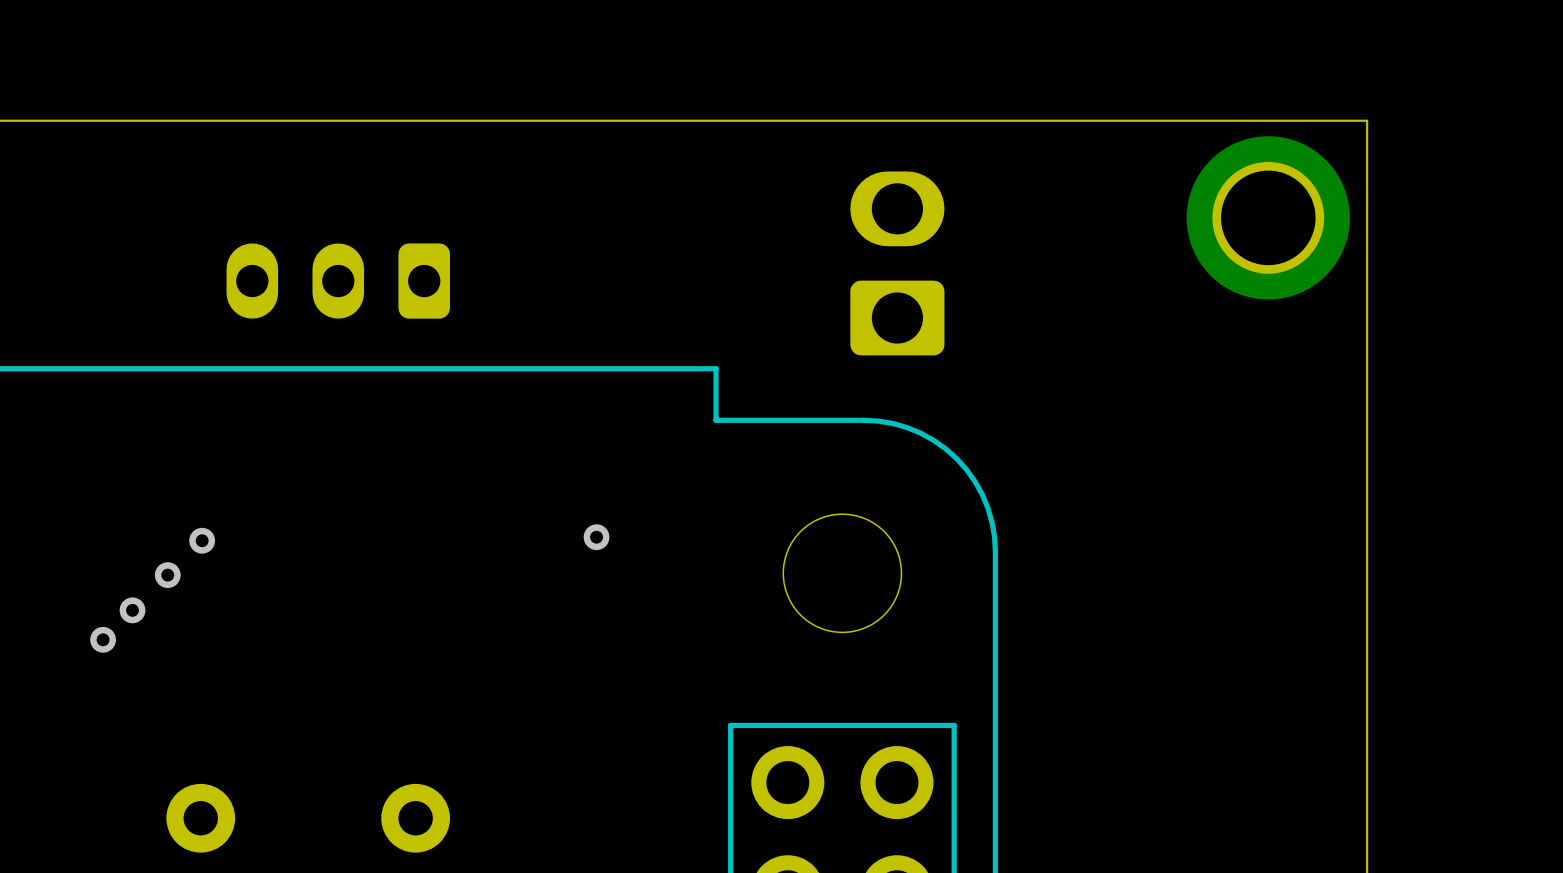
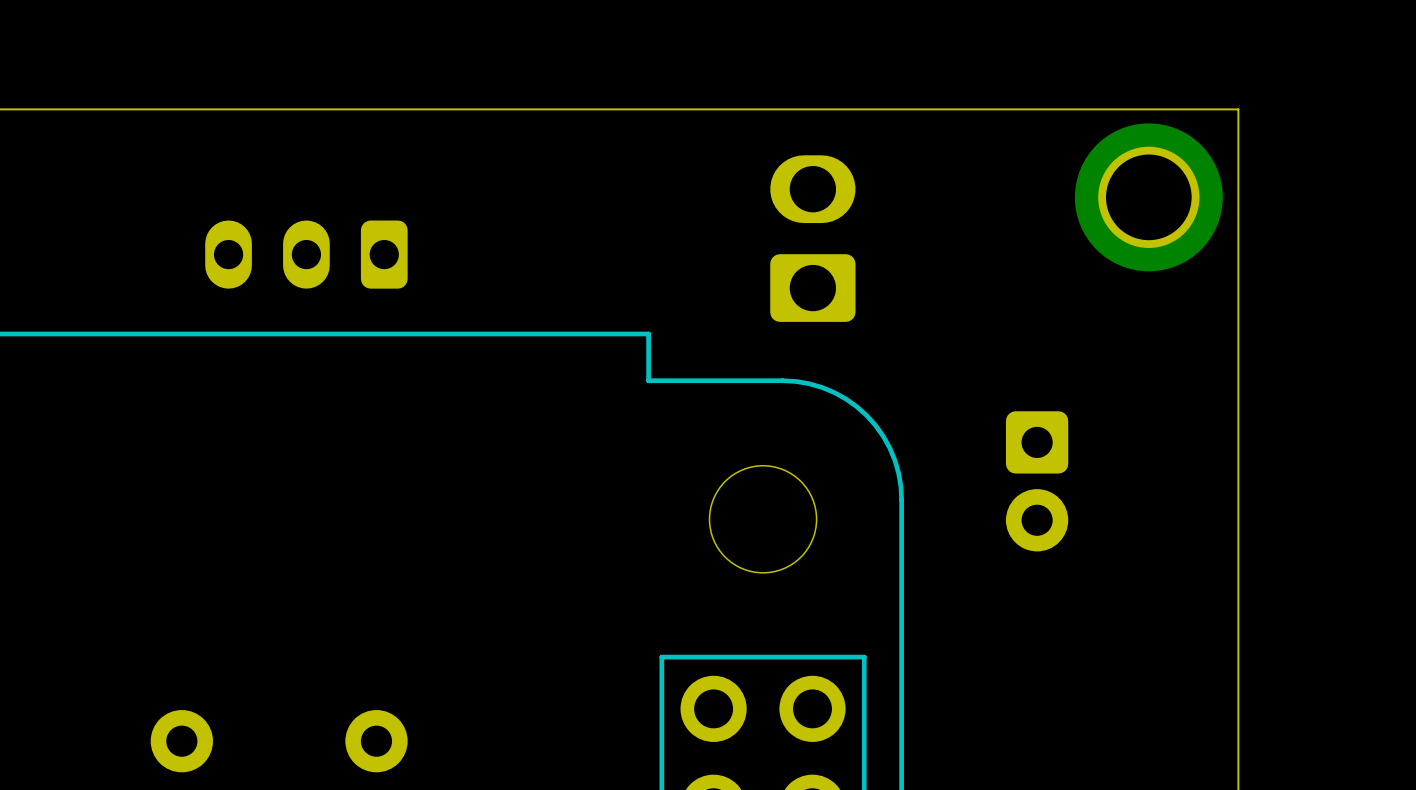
part: none -> (1037, 481)
via: (596, 537) -> none
via: (202, 540) -> none
via: (167, 575) -> none
via: (132, 610) -> none
via: (103, 639) -> none

